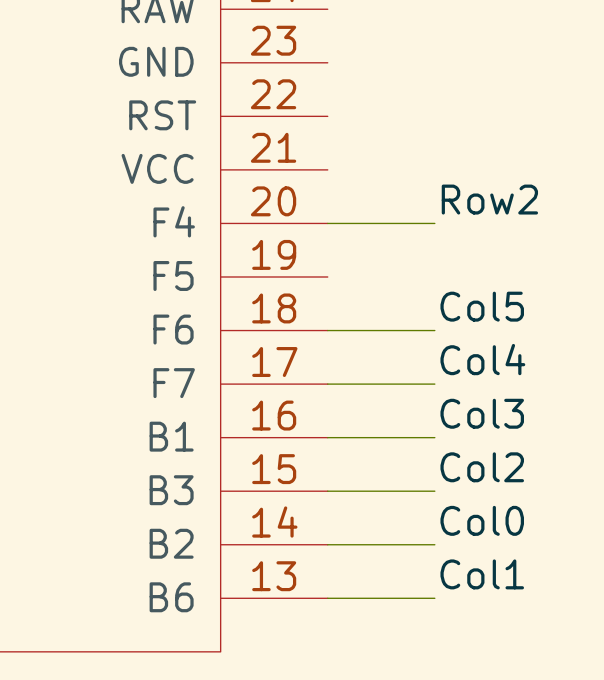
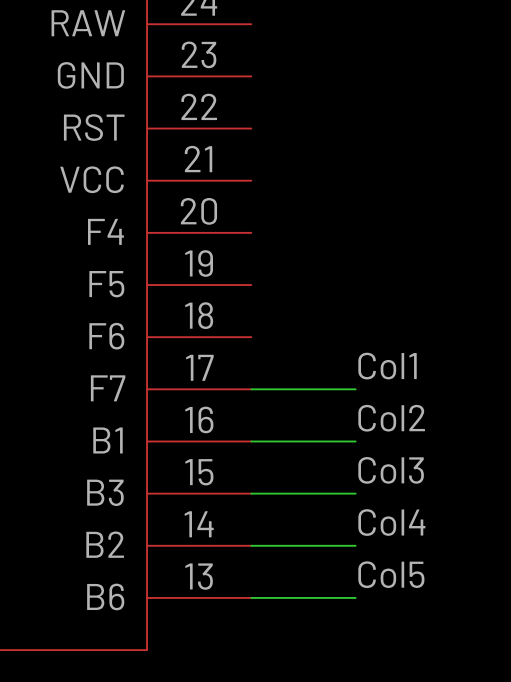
label: Row2 (489, 199) -> none
wire: (327, 223) (434, 223) -> none
label: Col5 (482, 306) -> none
wire: (327, 330) (434, 330) -> none
label: Col4 (482, 359) -> Col1 (387, 366)
label: Col3 (482, 413) -> Col2 (391, 418)
label: Col2 (482, 467) -> Col3 (391, 470)
label: Col0 (482, 520) -> Col4 (391, 522)
label: Col1 (482, 574) -> Col5 (391, 574)

